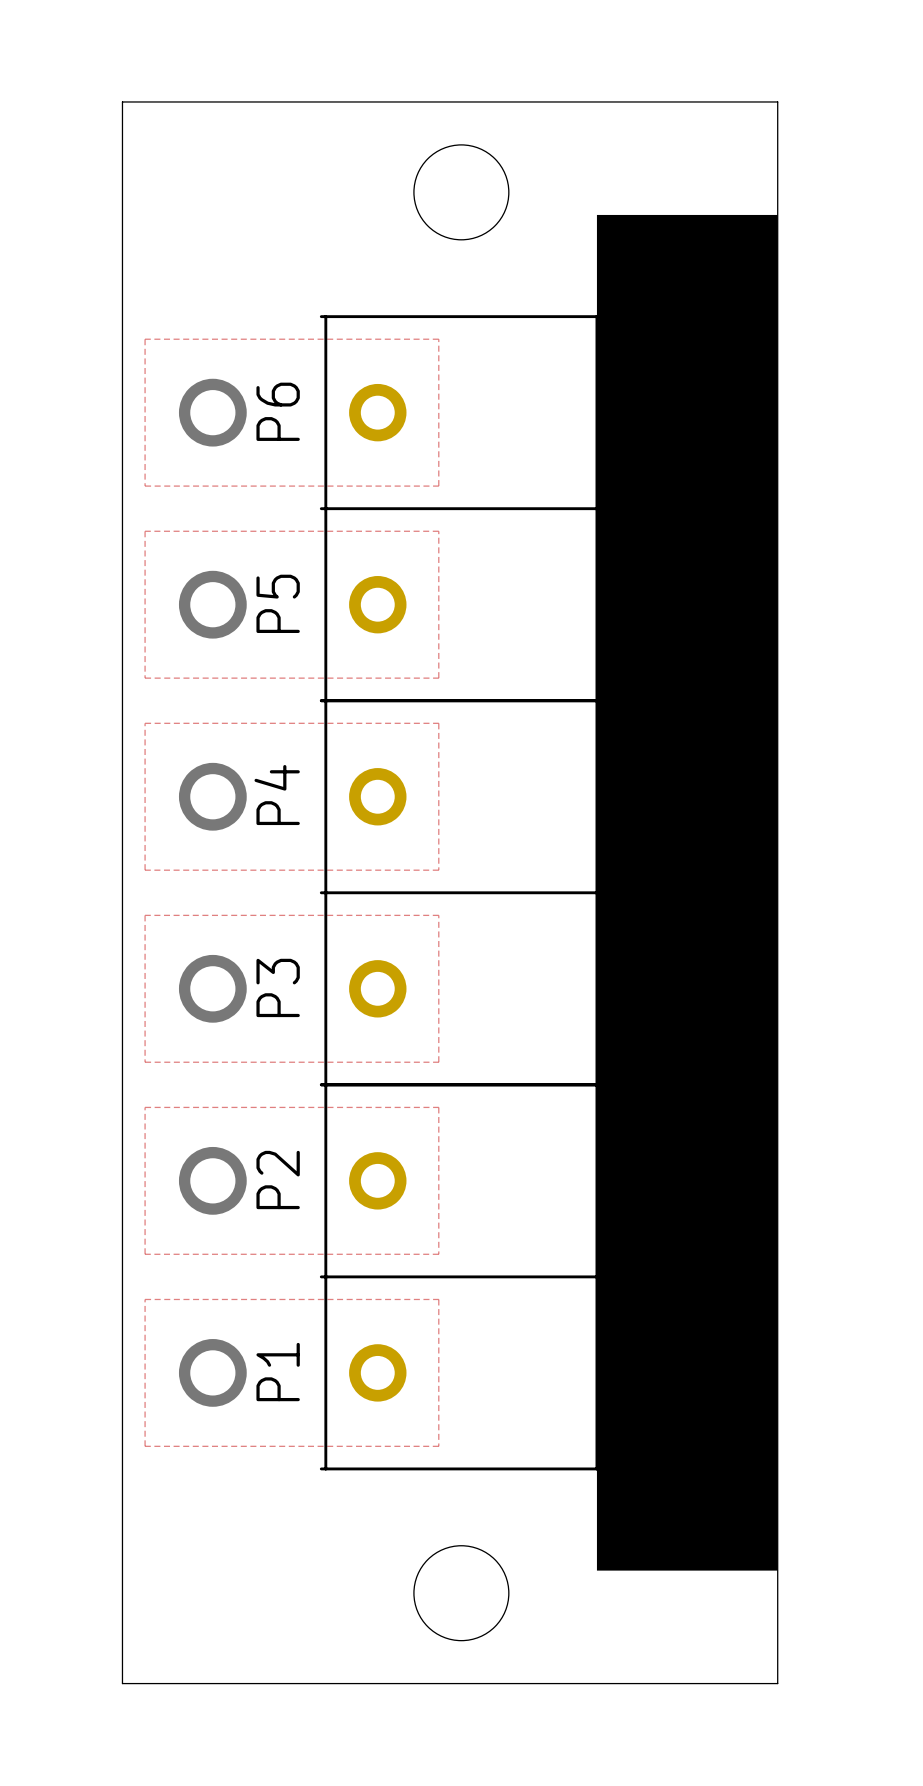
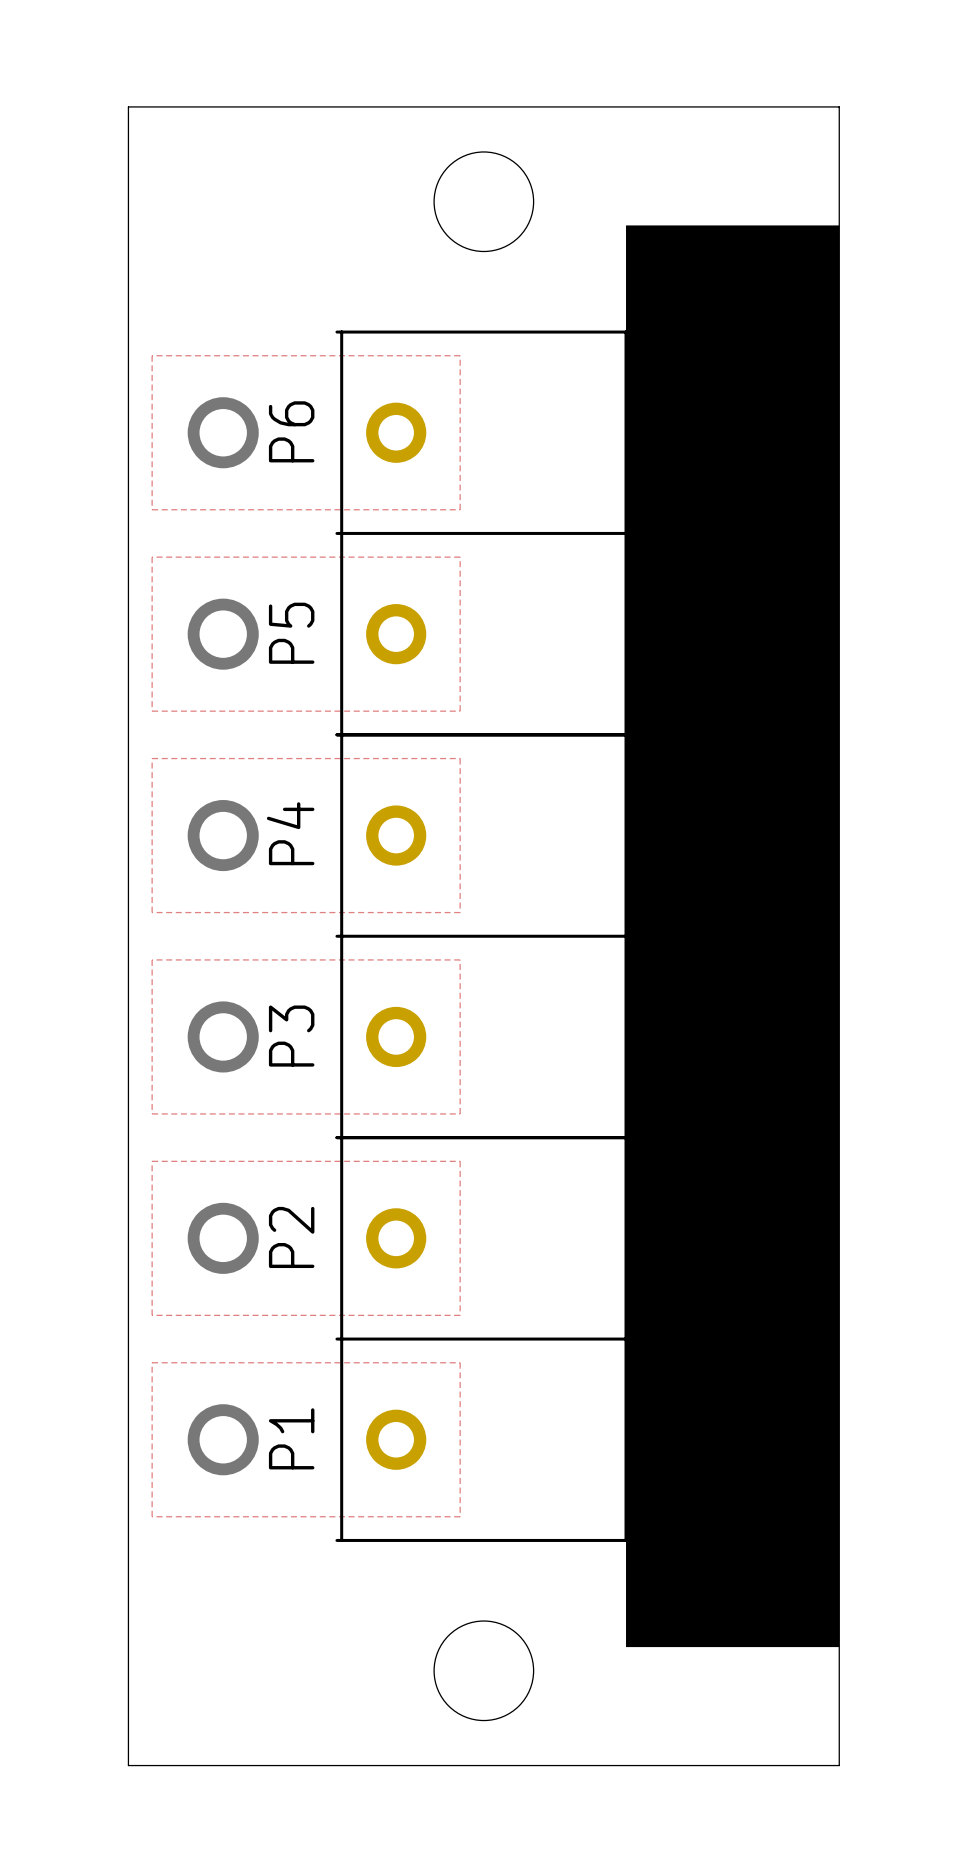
board edge: (777, 101) (777, 1683) -> (815, 106) (839, 106) (839, 1765) (815, 1765)
drawing shape: [596, 214, 778, 1571] -> [626, 225, 840, 1648]

